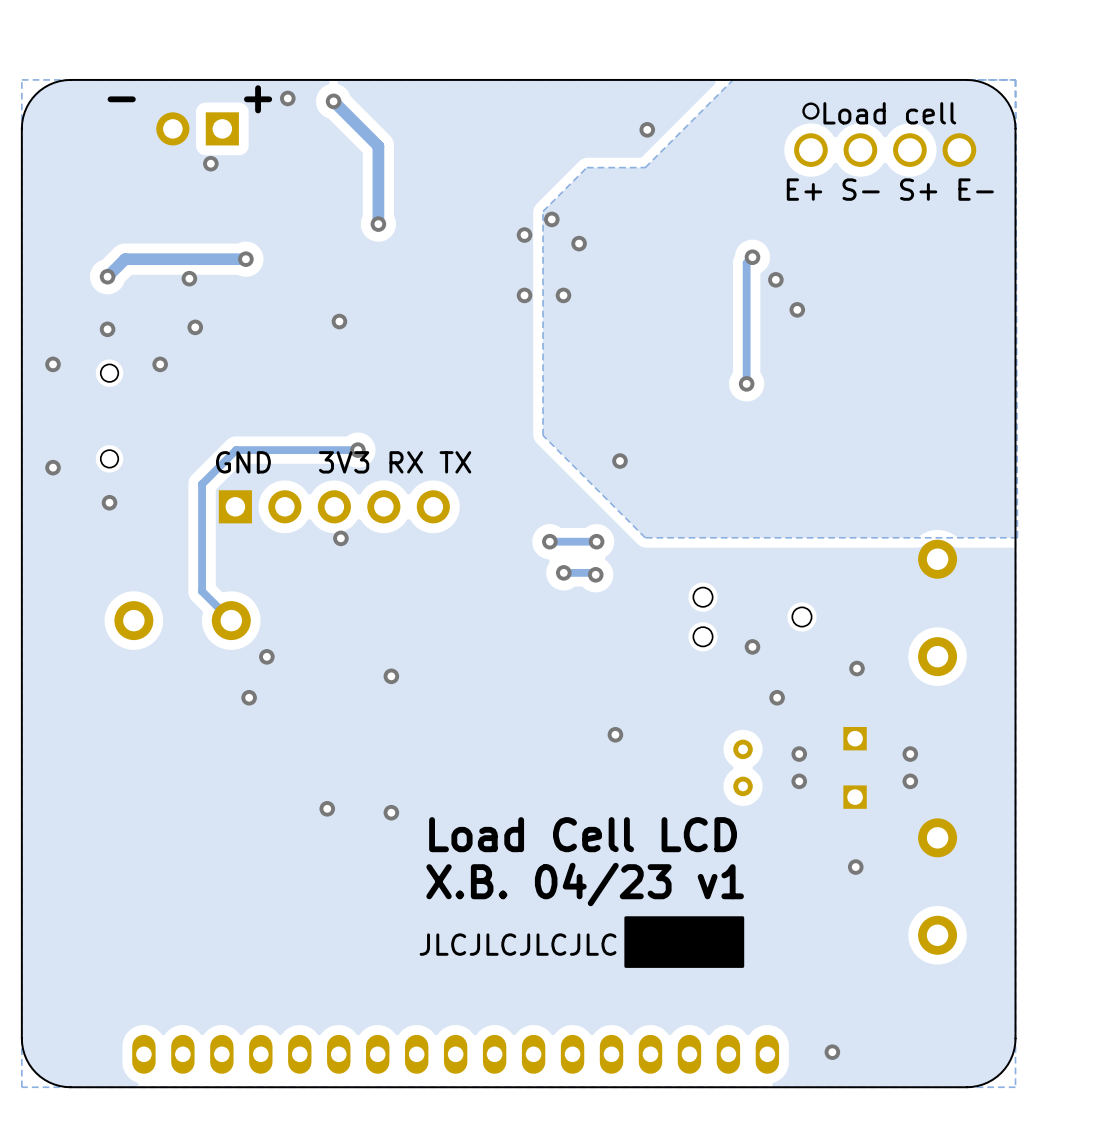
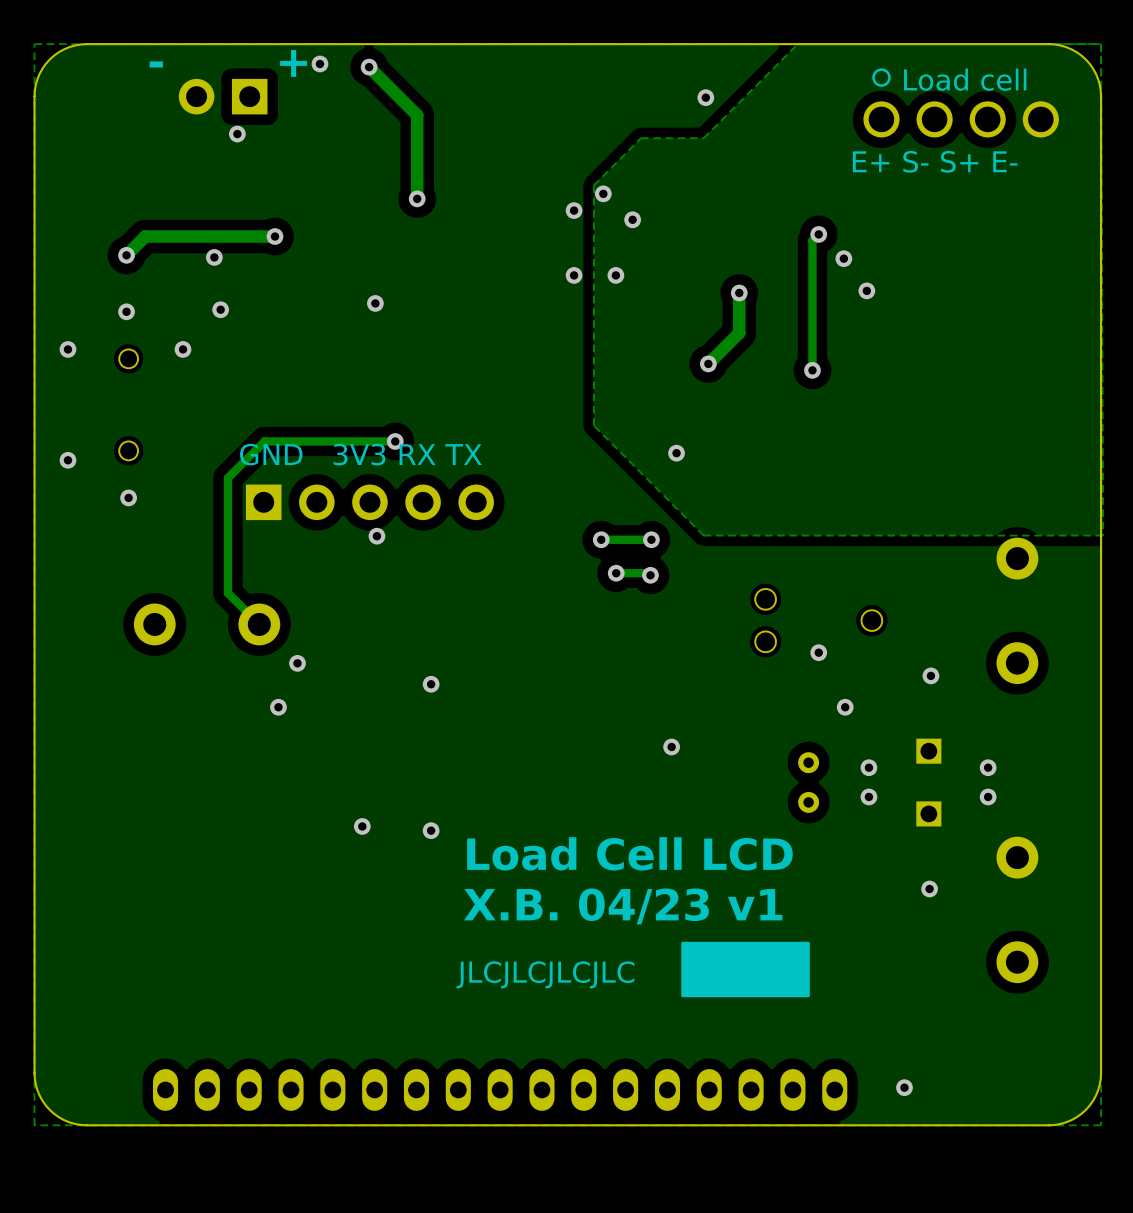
track: none -> (739, 292) (739, 332) (708, 363)
via: none -> (739, 292)
via: none -> (708, 363)

